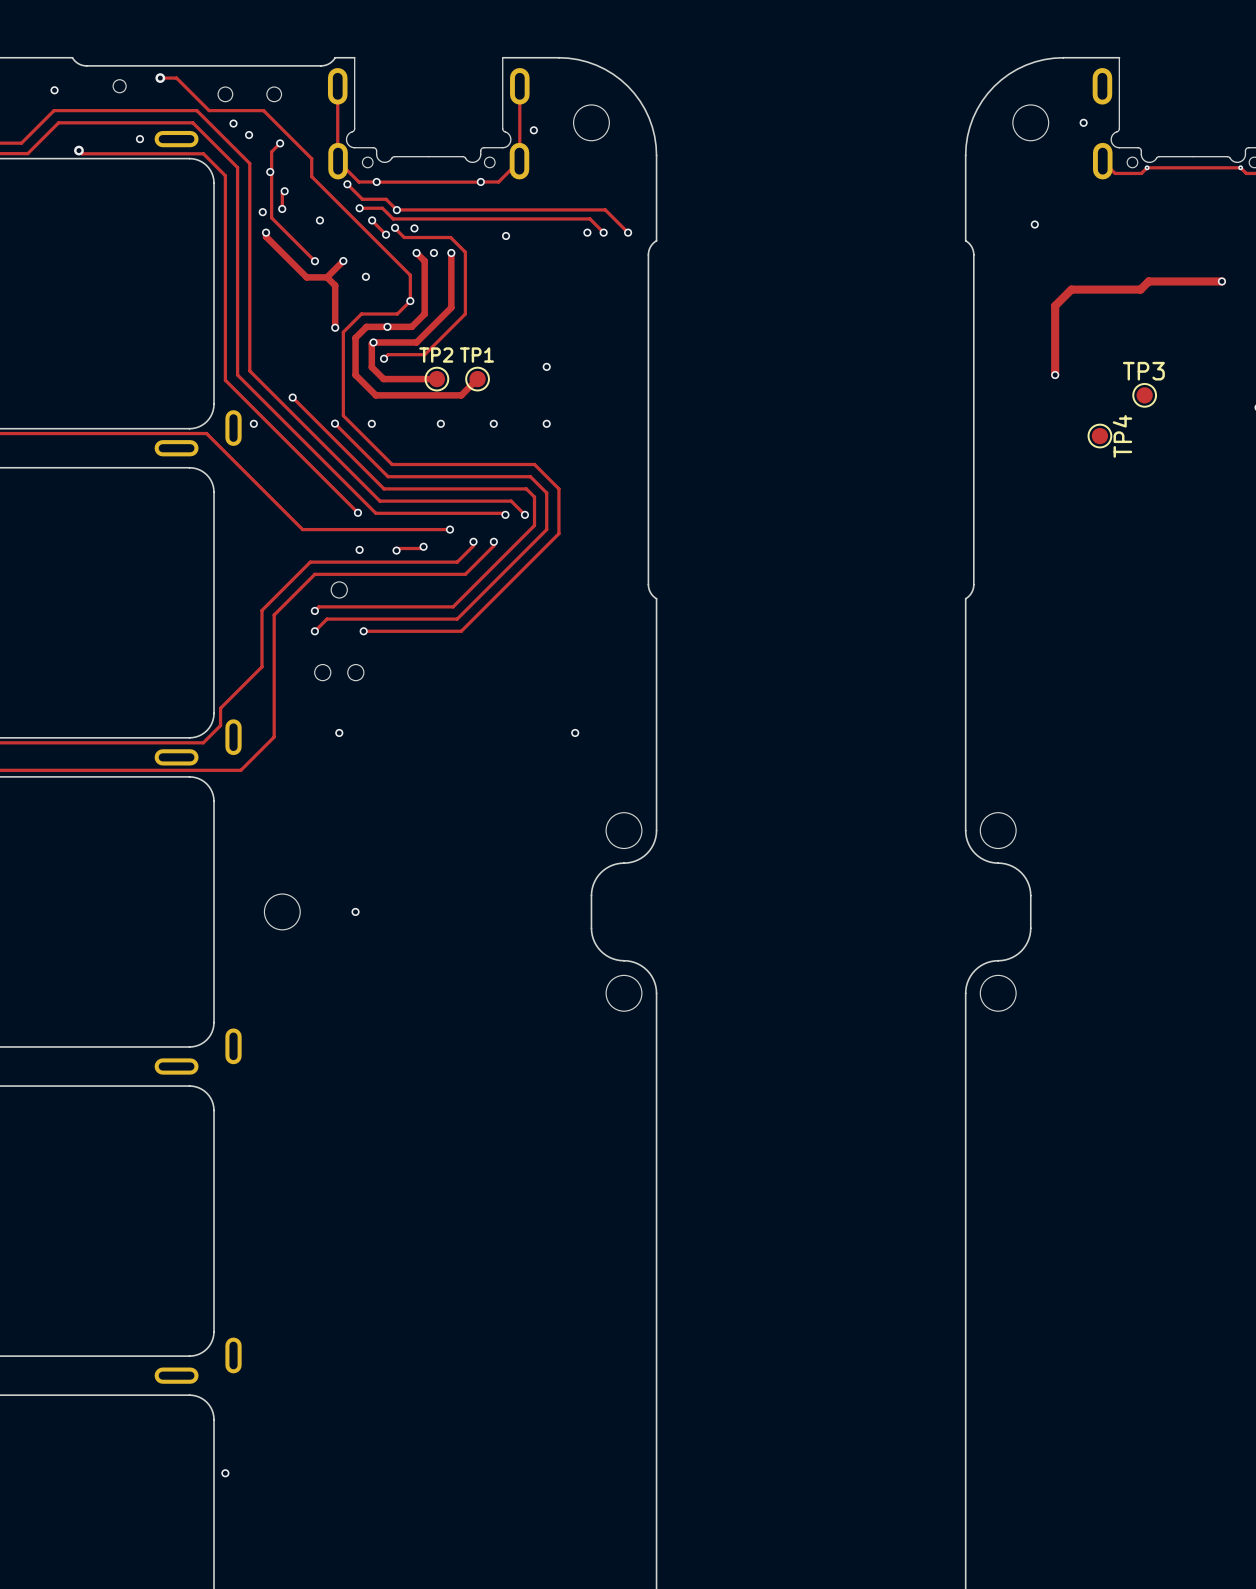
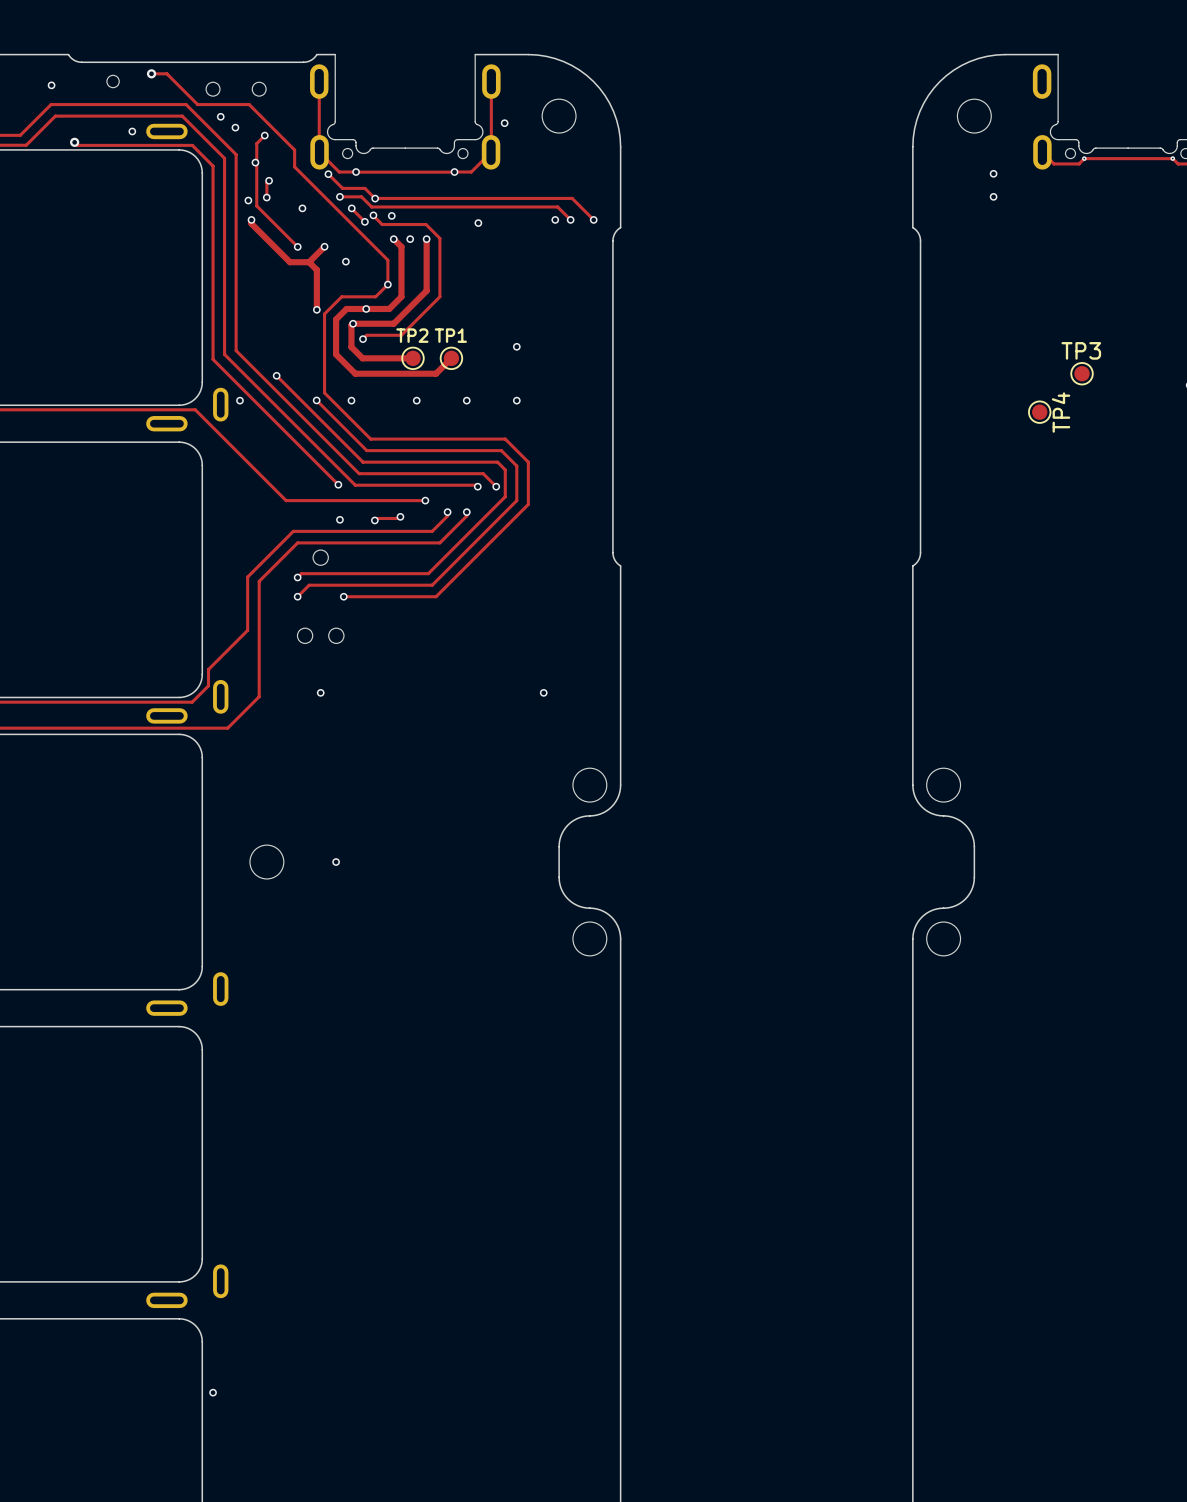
via: (1083, 122) -> none
via: none -> (993, 173)
via: none -> (993, 196)
via: (1034, 224) -> none
track: (1221, 281) (1148, 281) (1140, 289) (1071, 289) (1055, 305) (1055, 375) -> none
via: (1221, 281) -> none
via: (1055, 375) -> none

